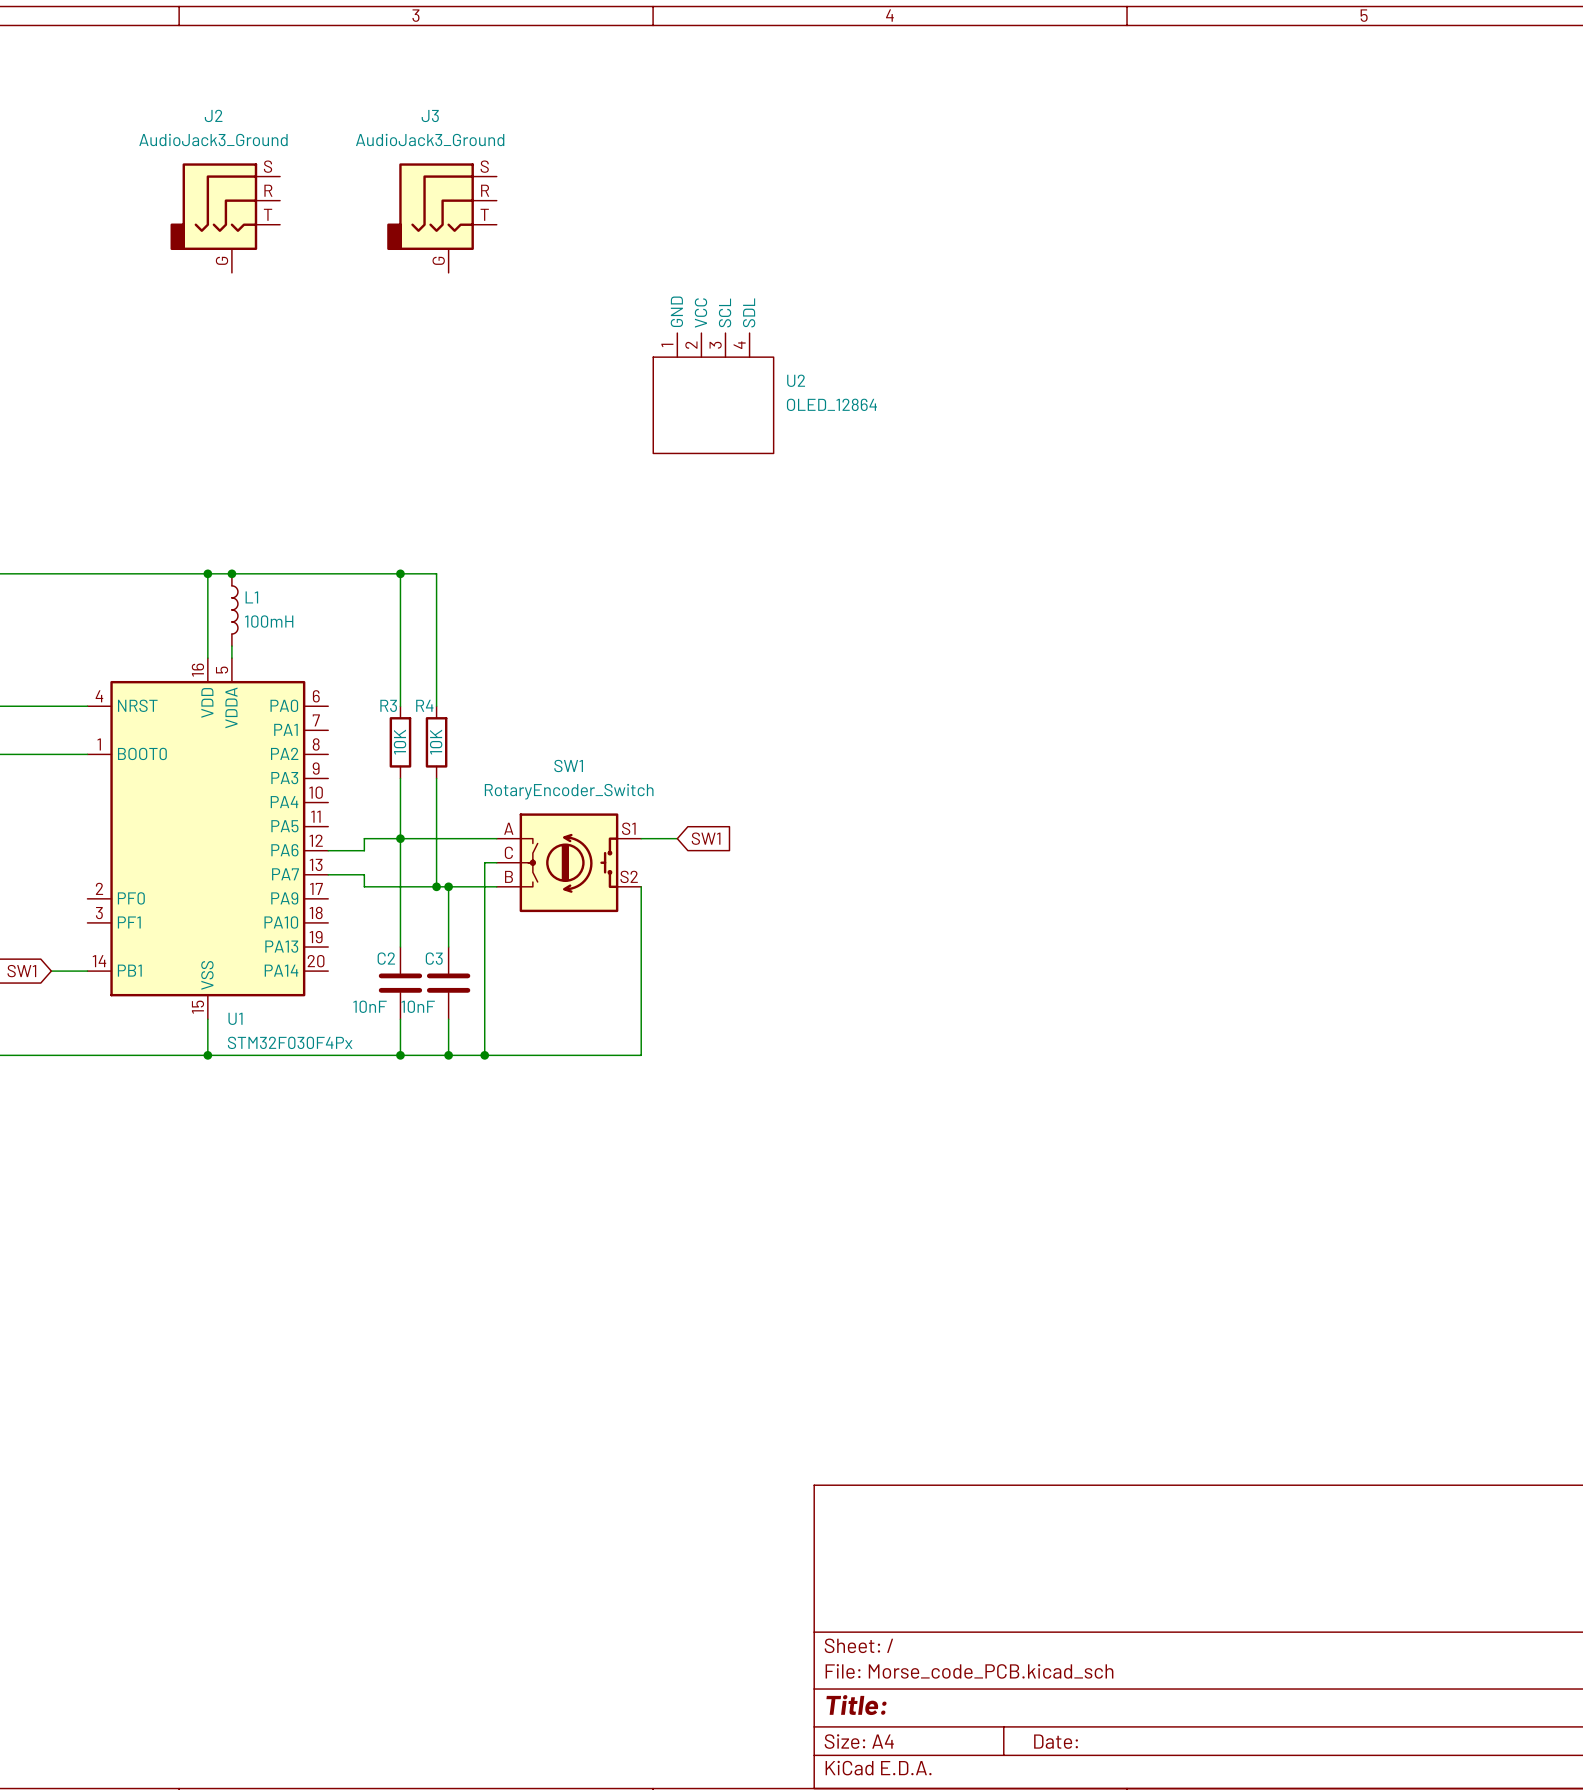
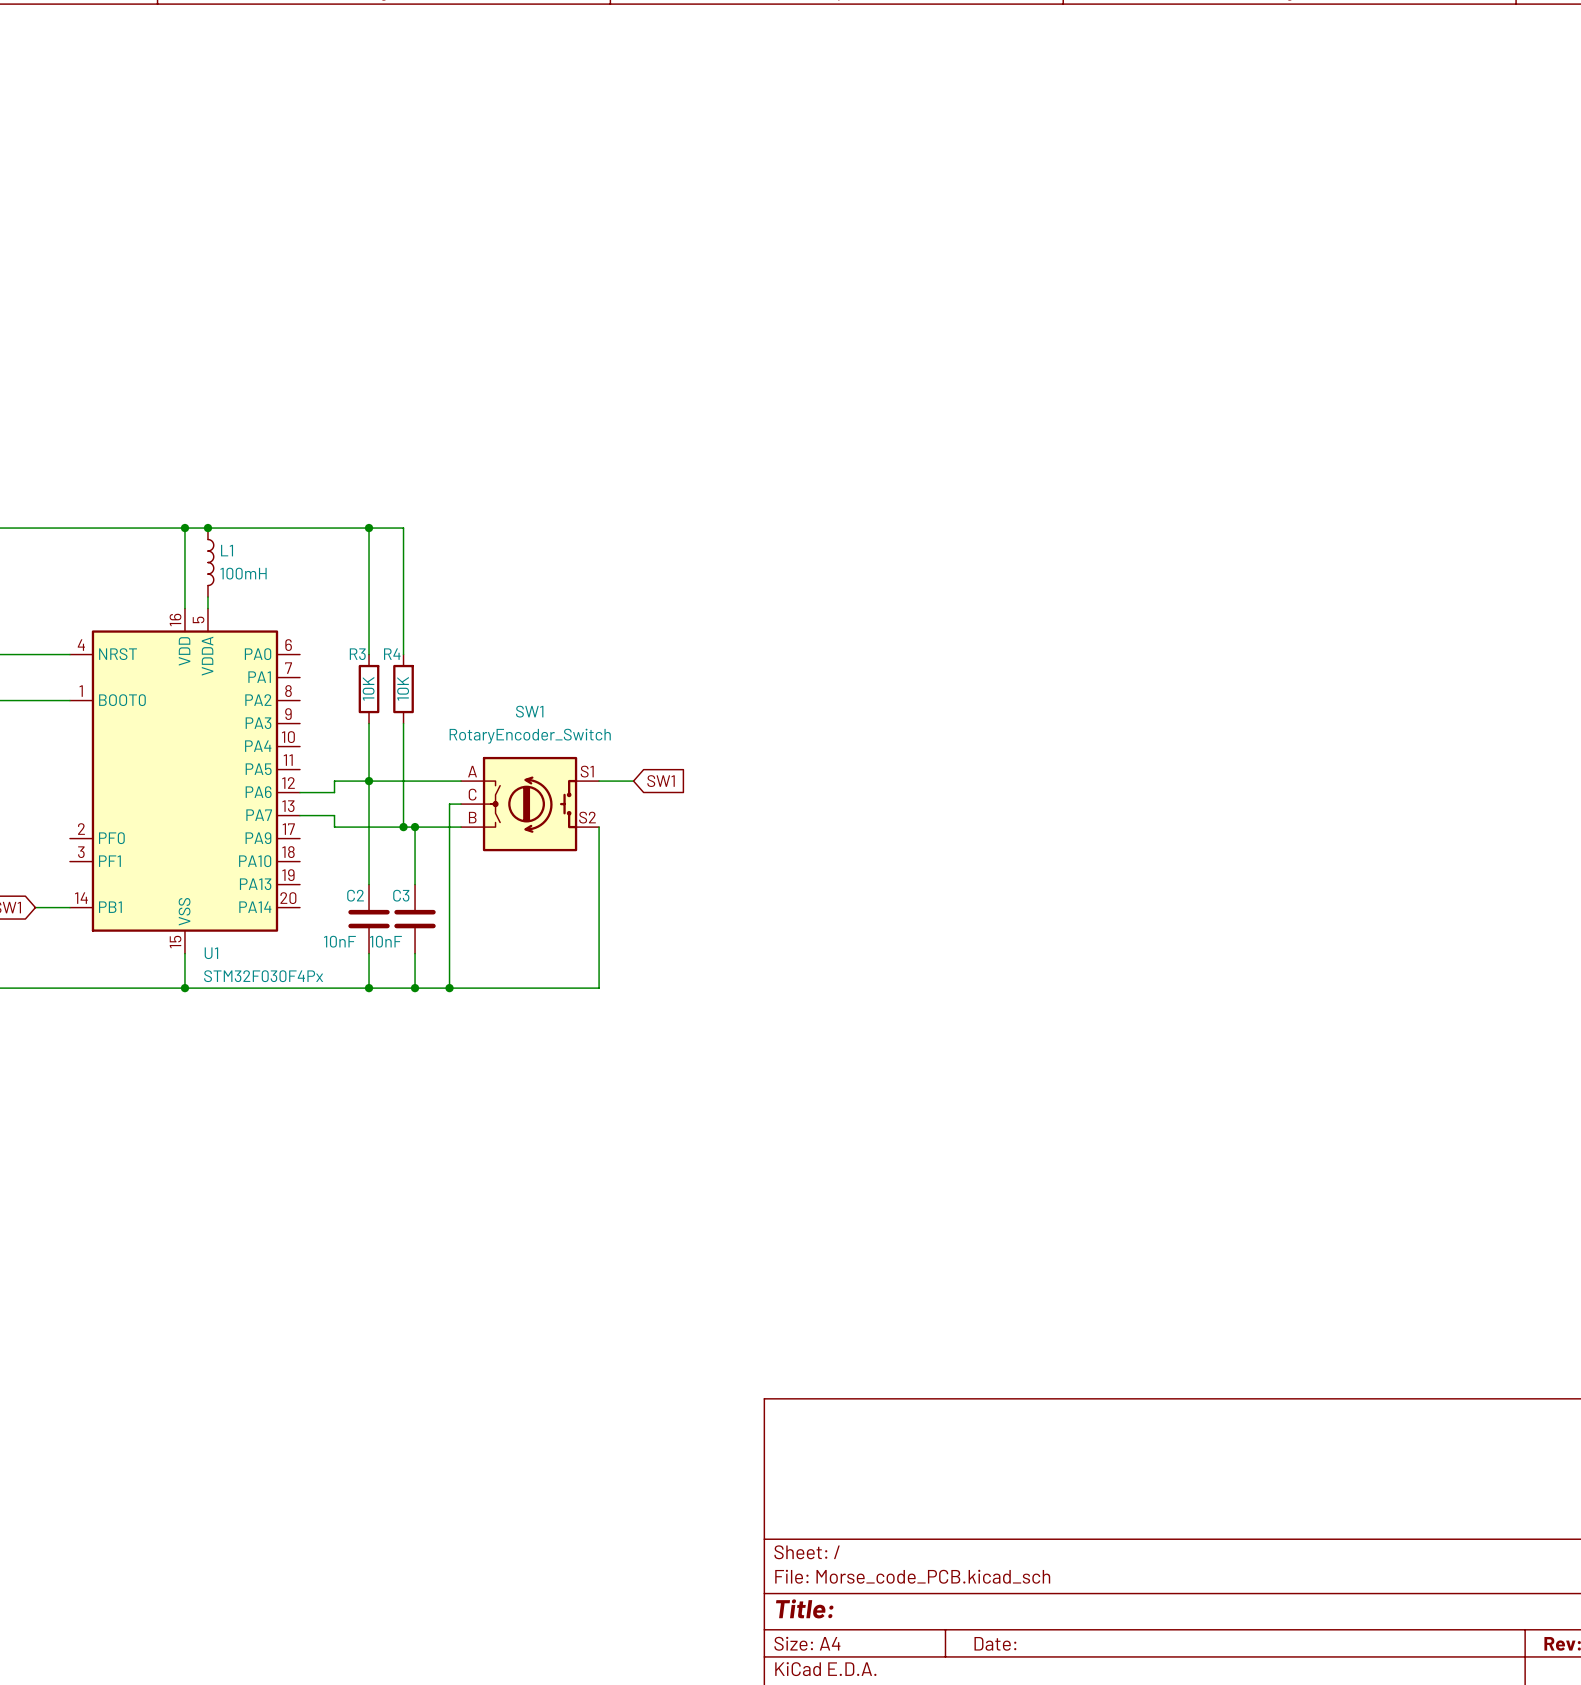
J2: AudioJack3_Ground (225, 218) -> none
J3: AudioJack3_Ground (441, 218) -> none
U2: OLED_12864 (713, 393) -> none

